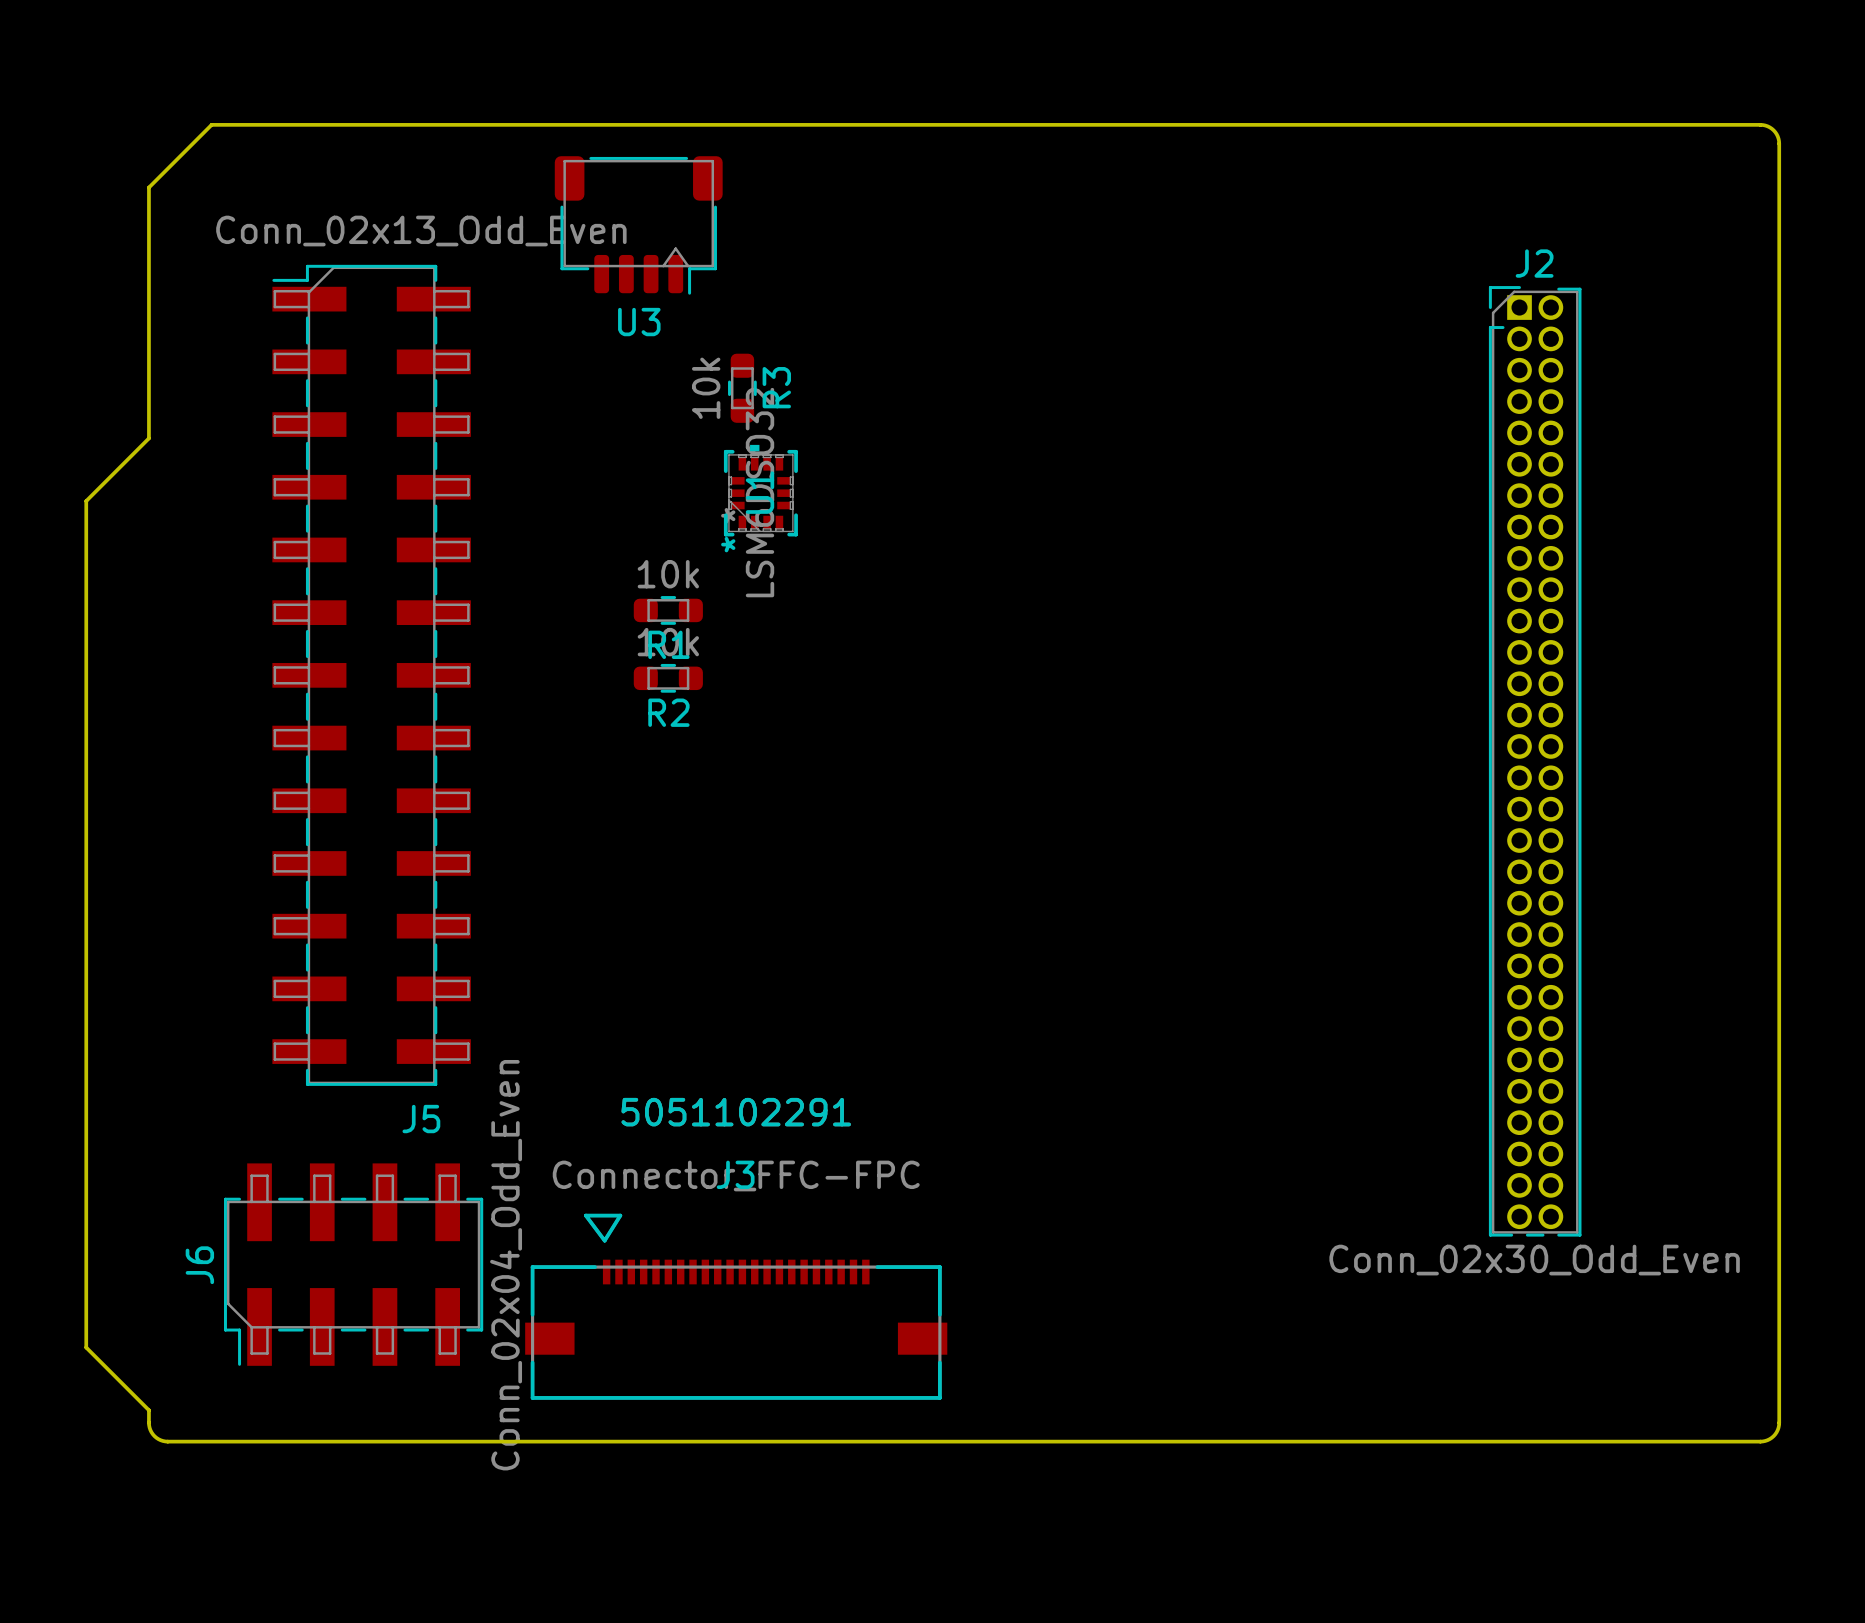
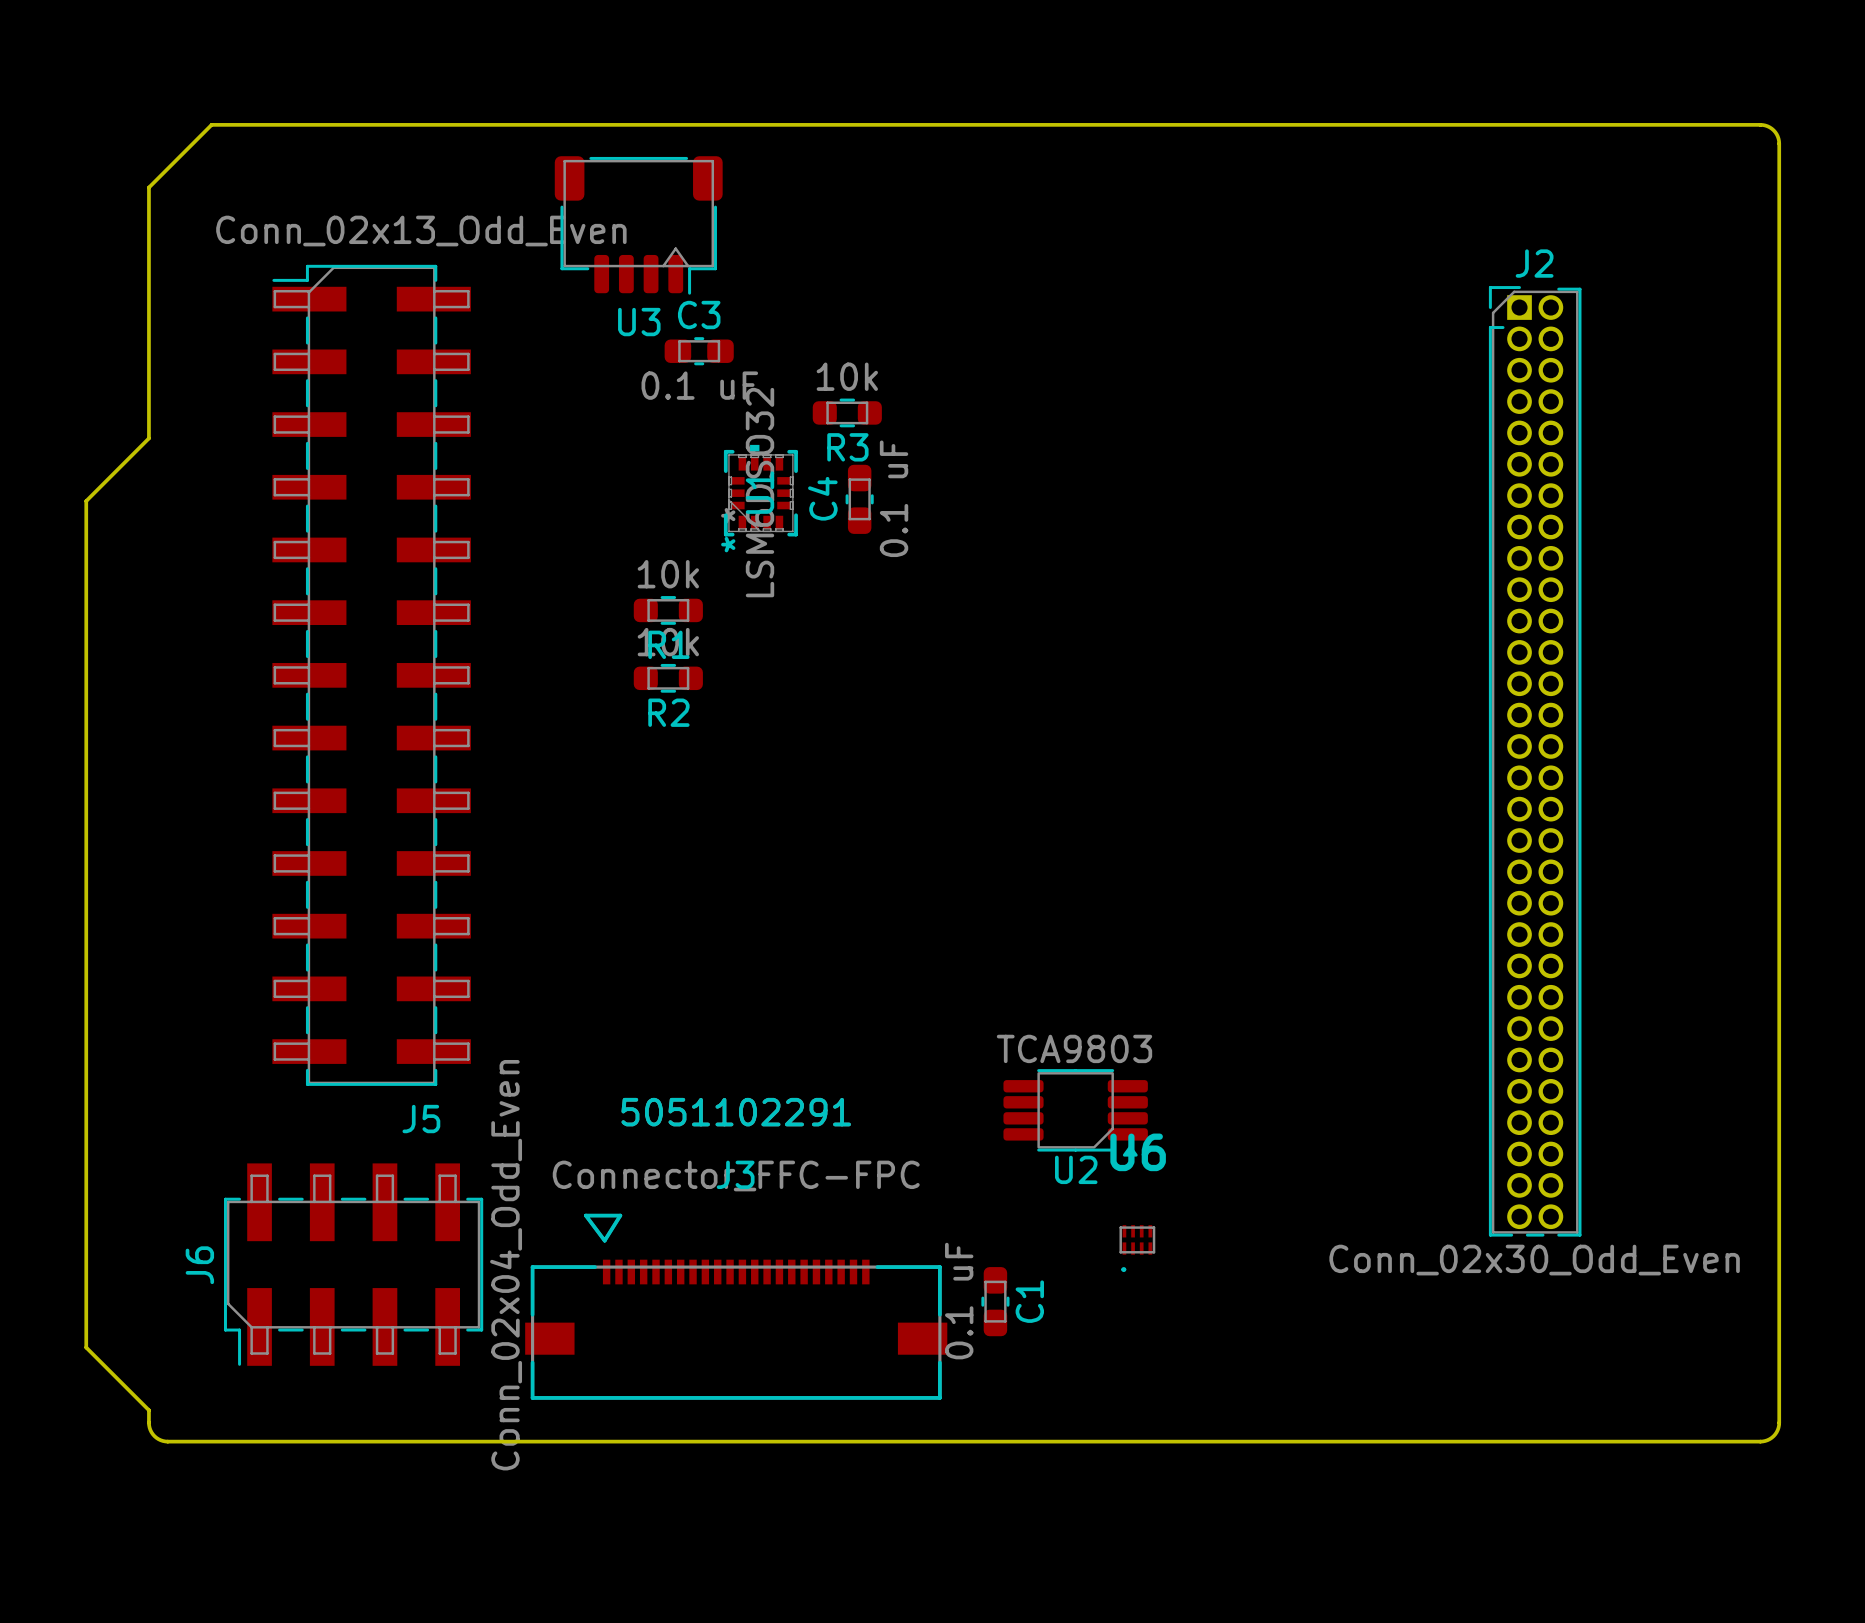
C3: none -> 0.1 uF (699, 351)
R3 rotation: 0° (742, 388) -> 90° clockwise (847, 412)
R3 position: (742, 388) -> (847, 412)
C4: none -> 0.1 uF (859, 499)
U2: none -> TCA9803 (1075, 1112)
U6: none -> (1137, 1248)
C1: none -> 0.1 uF (995, 1301)

